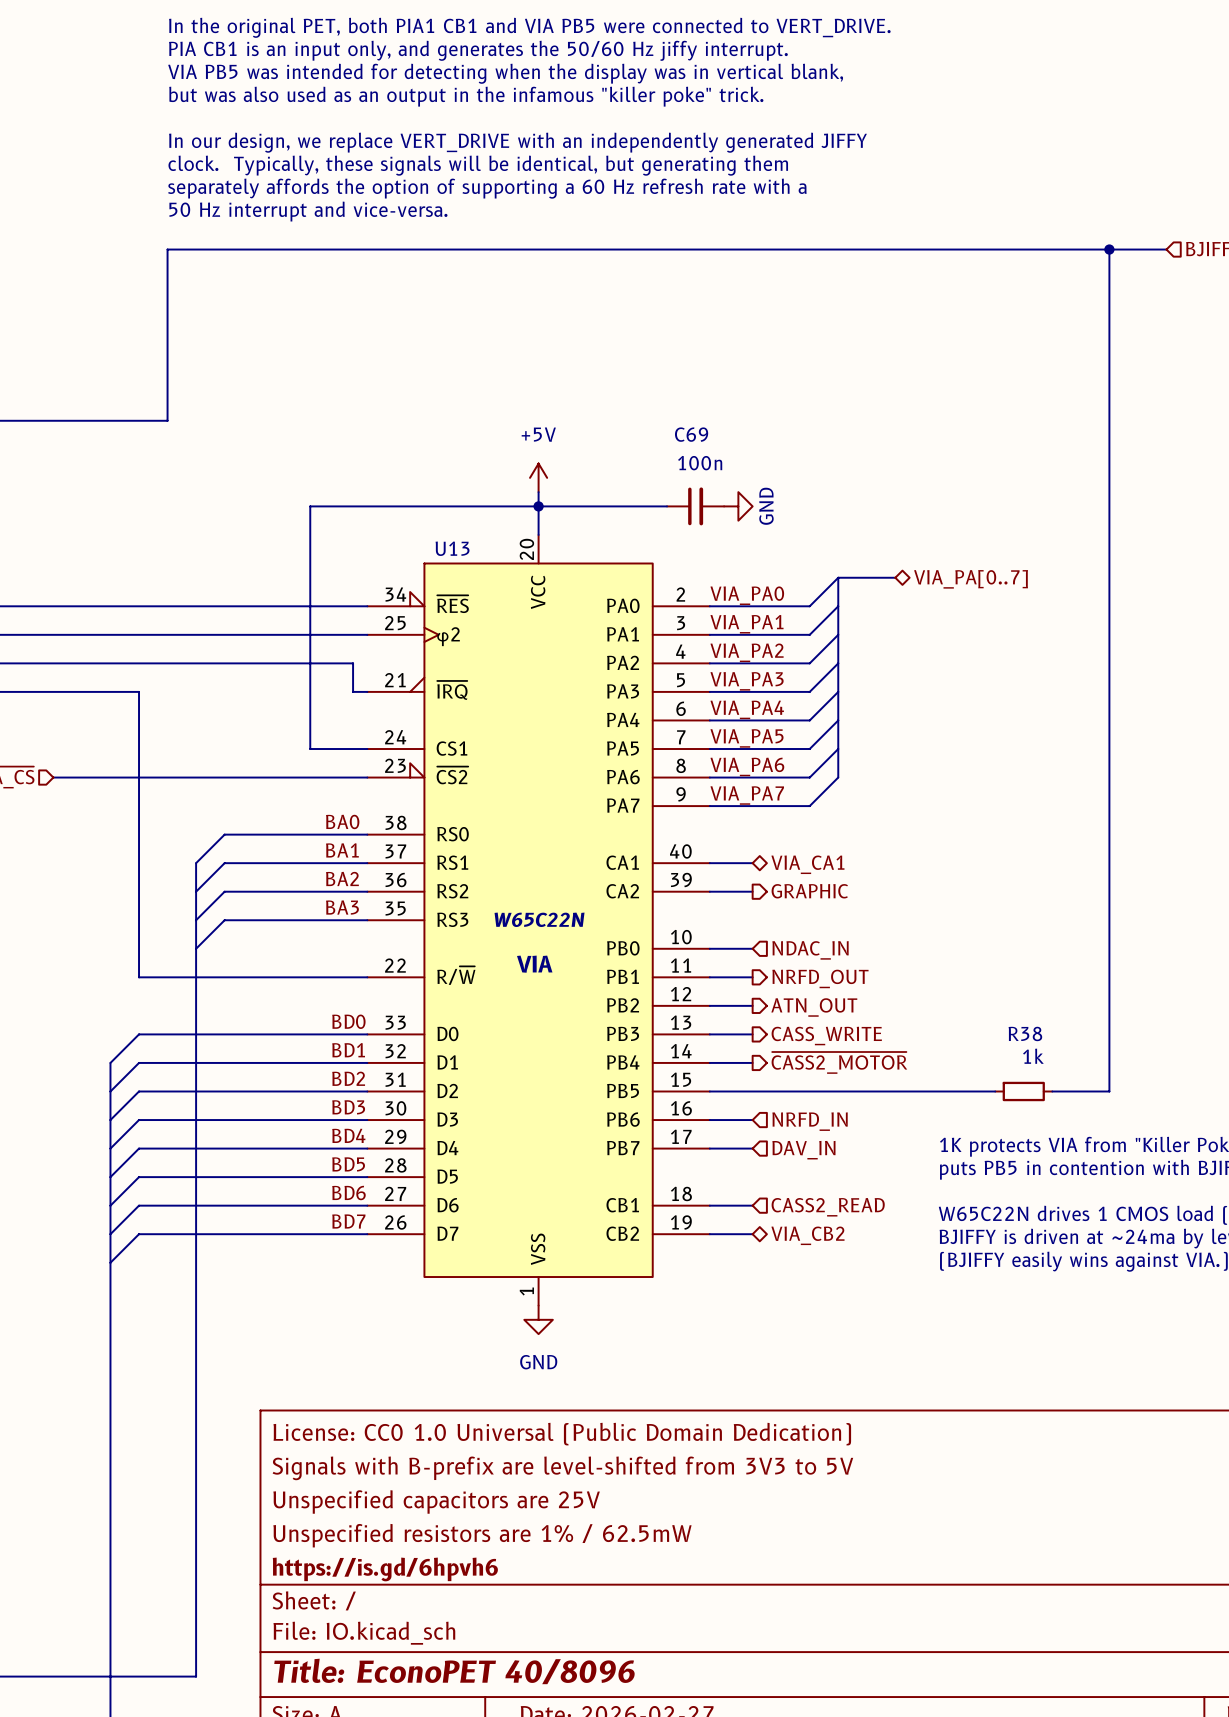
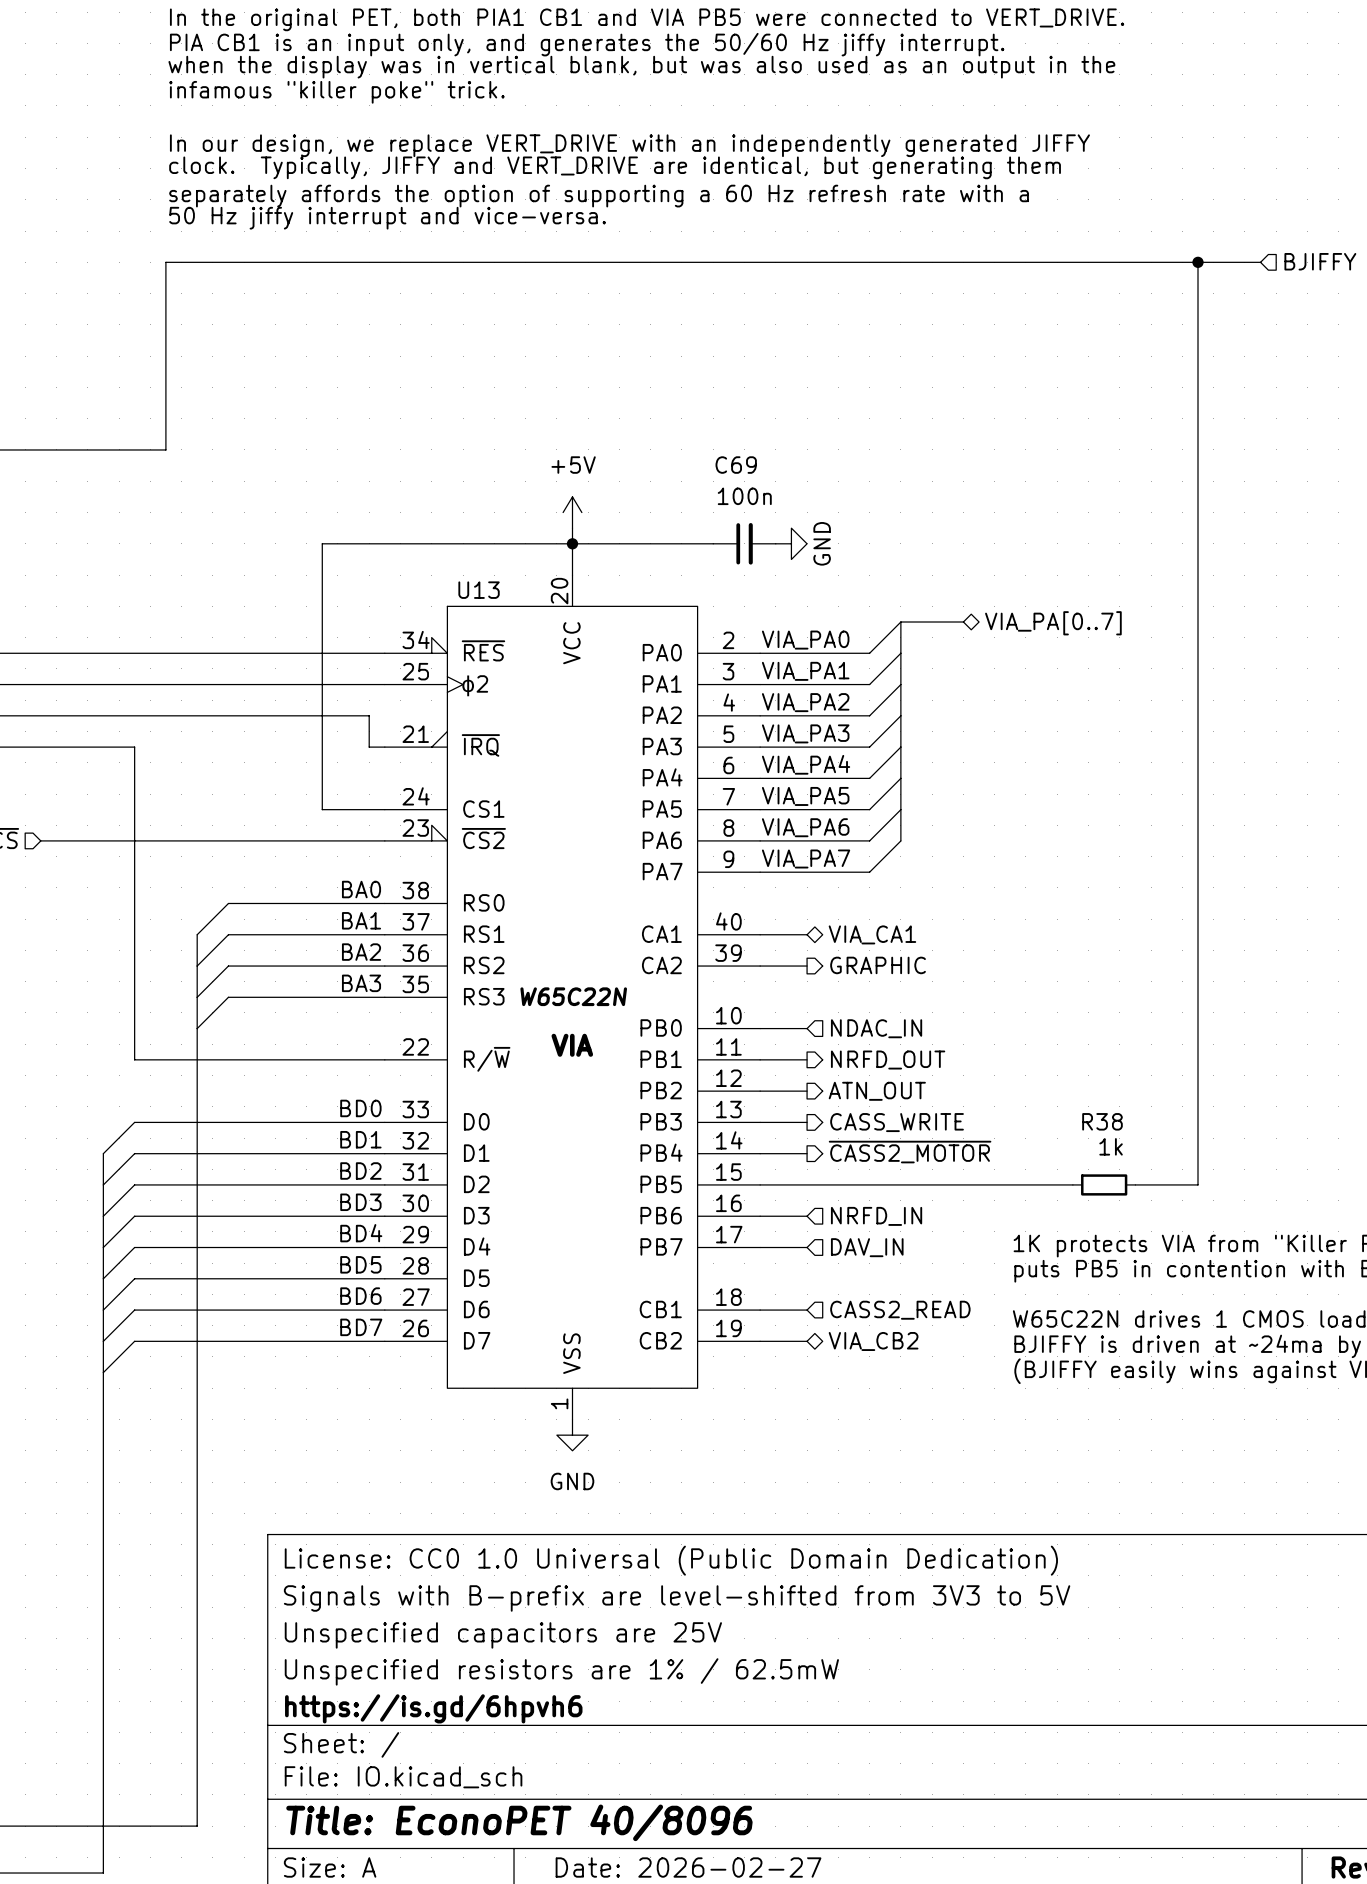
text: VIA PB5 was intended for detecting when the display was in vertical blank, (505, 73) -> when the display was in vertical blank, but was also used as an output in the (641, 67)
text: but was also used as an output in the infamous "killer poke" trick. (466, 96) -> infamous "killer poke" trick. (336, 92)
text: clock. Typically, these signals will be identical, but generating them (478, 165) -> clock. Typically, JIFFY and VERT_DRIVE are identical, but generating them (615, 167)
text: 50 Hz interrupt and vice-versa. (308, 211) -> 50 Hz jiffy interrupt and vice-versa. (387, 218)

